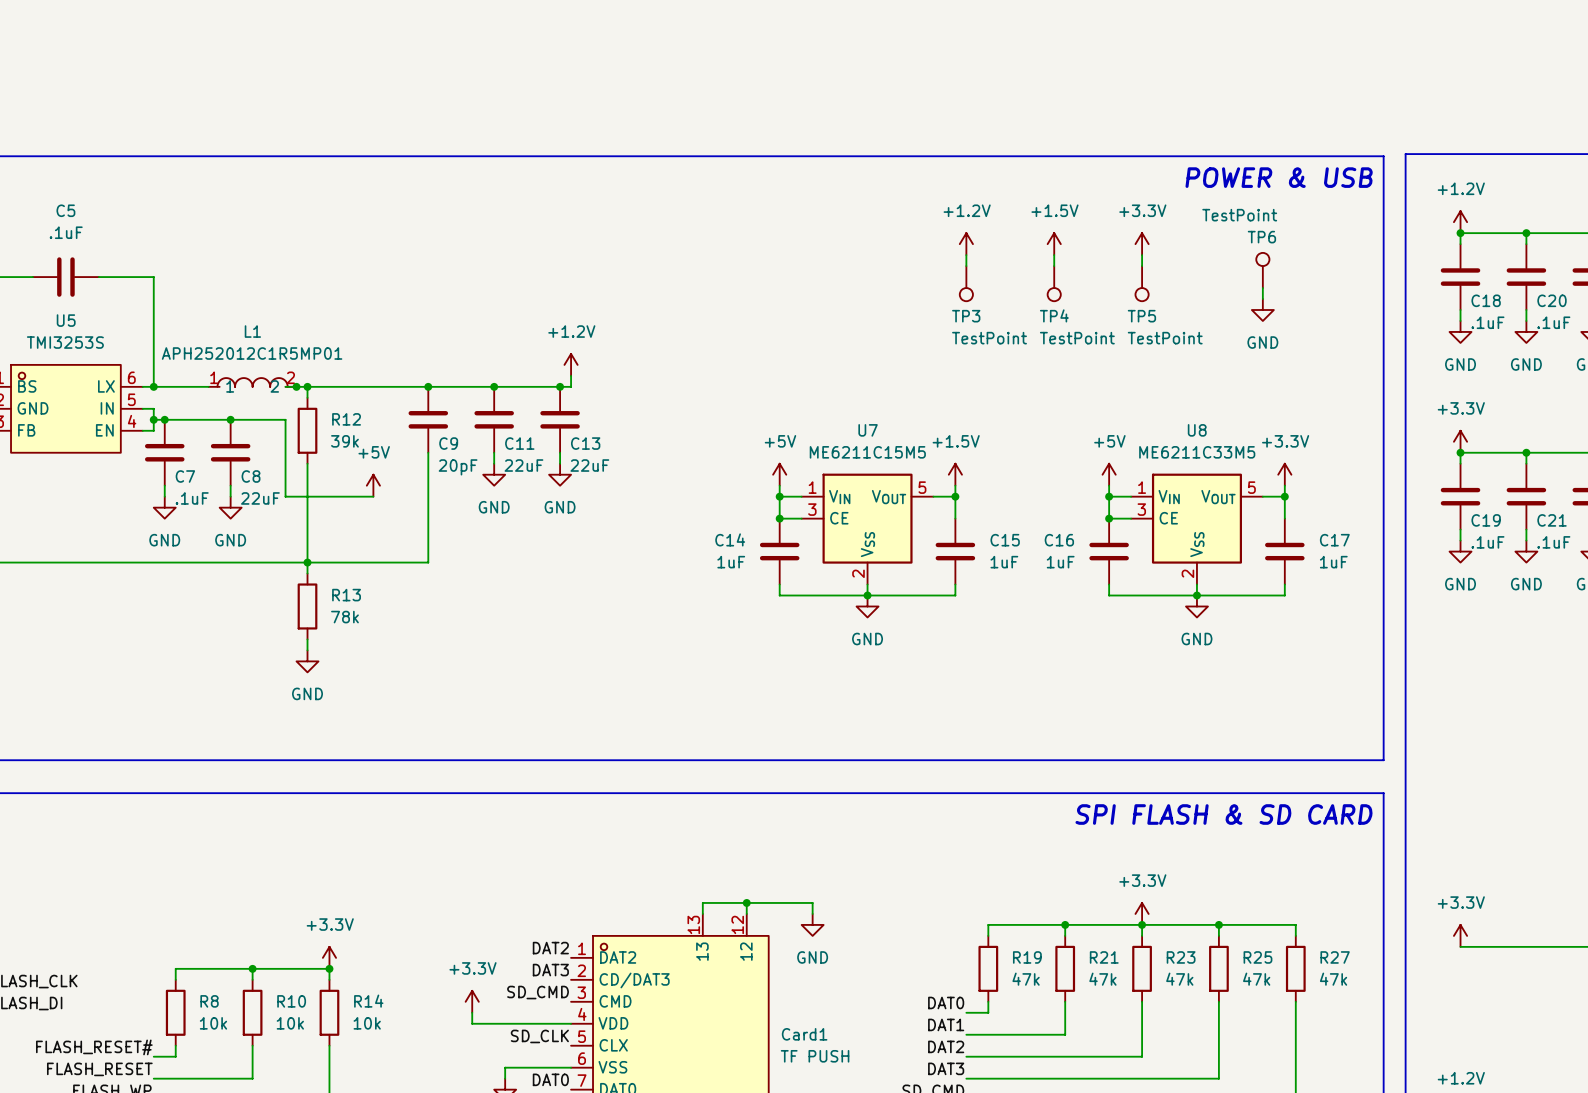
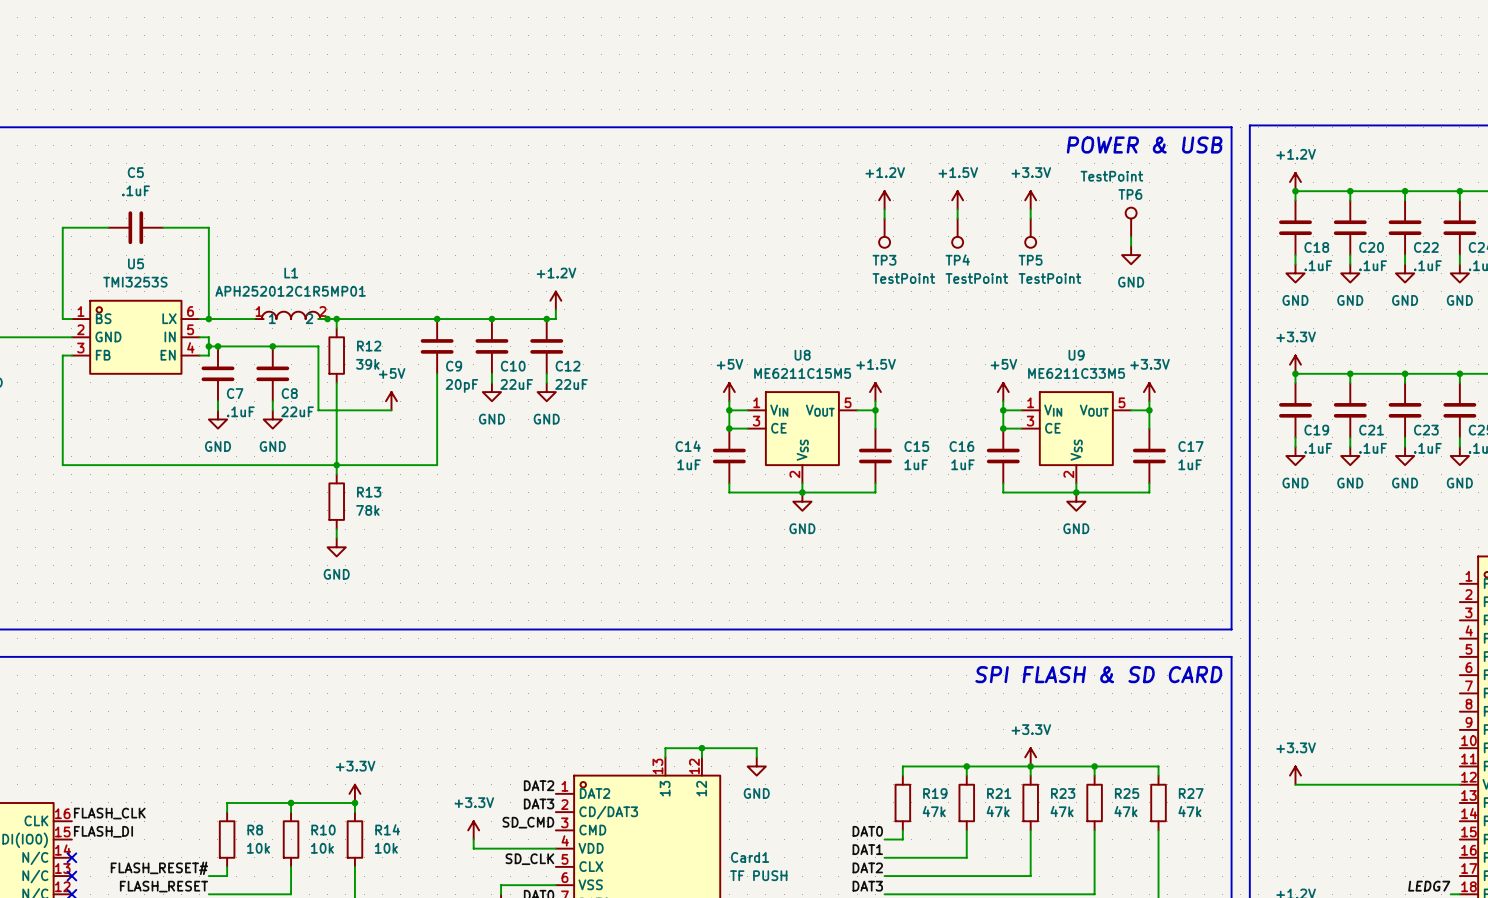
U7 name: U7 (868, 430) -> U8 (802, 355)
U8 name: U8 (1197, 430) -> U9 (1076, 355)
C11 name: C11 (519, 443) -> C10 (513, 366)
C13 name: C13 (585, 443) -> C12 (568, 366)

